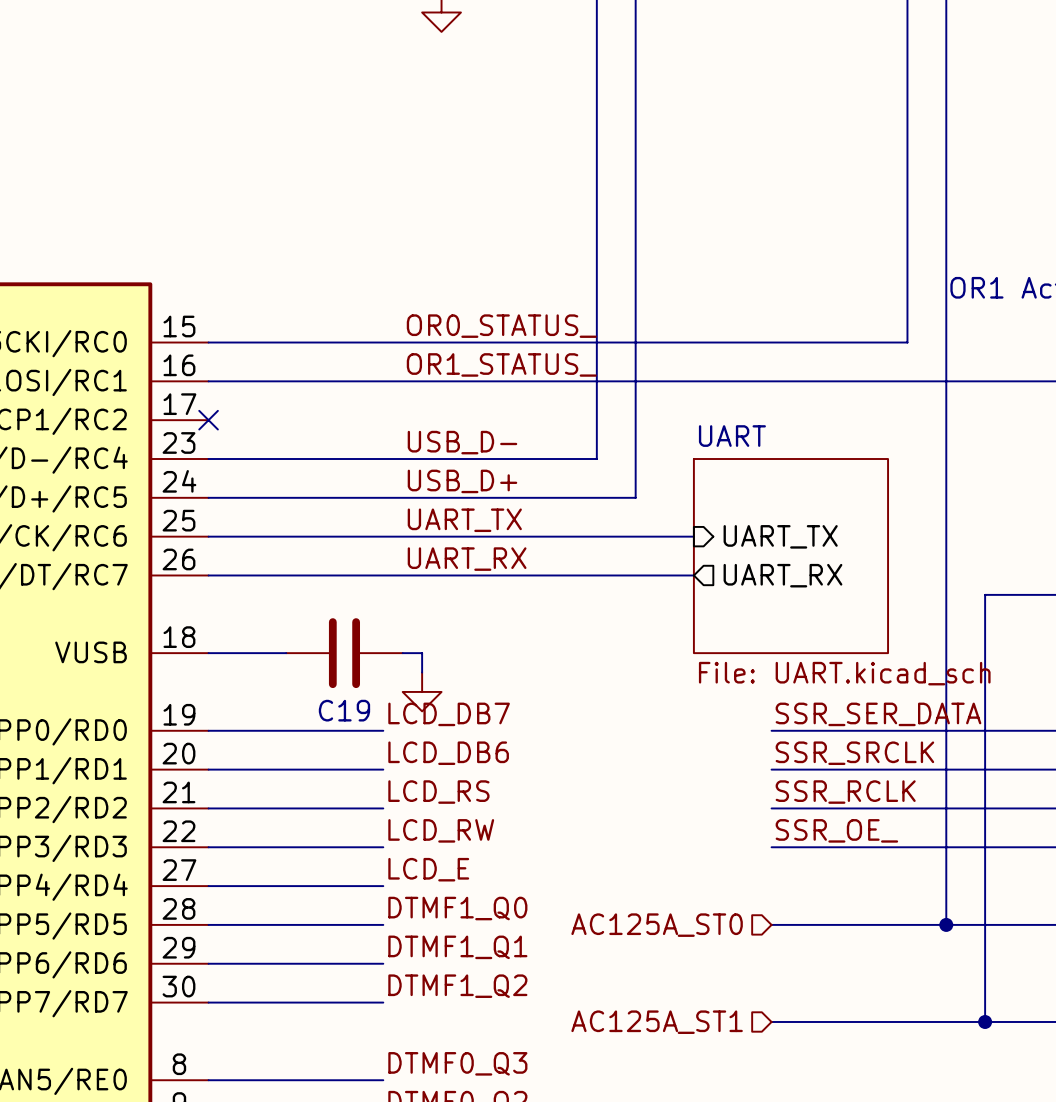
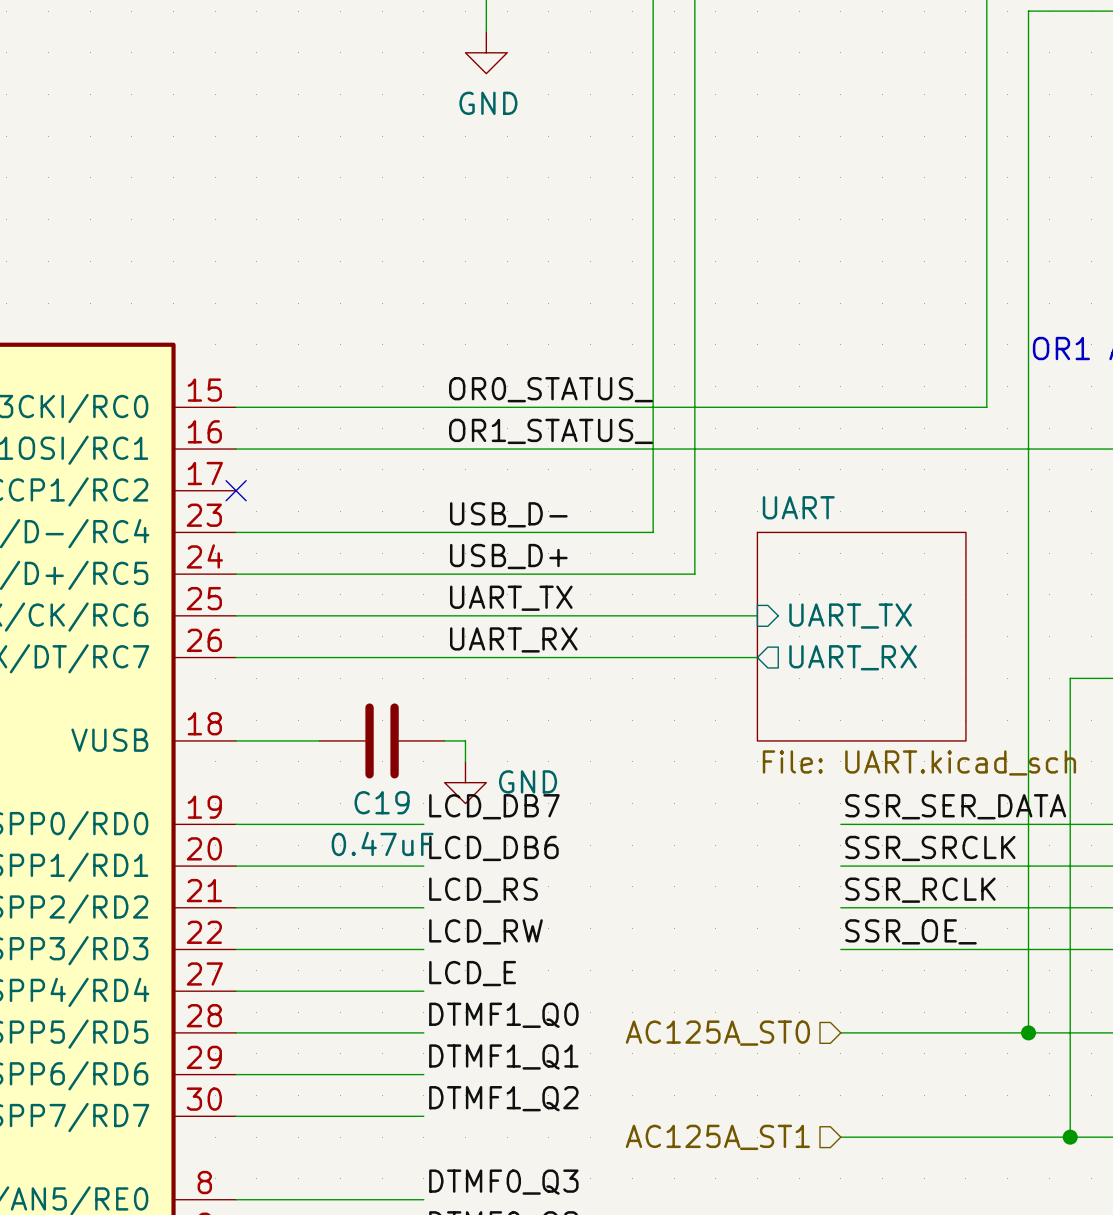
power symbol text: none -> GND (488, 103)
power symbol text: none -> GND (528, 781)
C19 value: none -> 0.47uF (382, 843)

